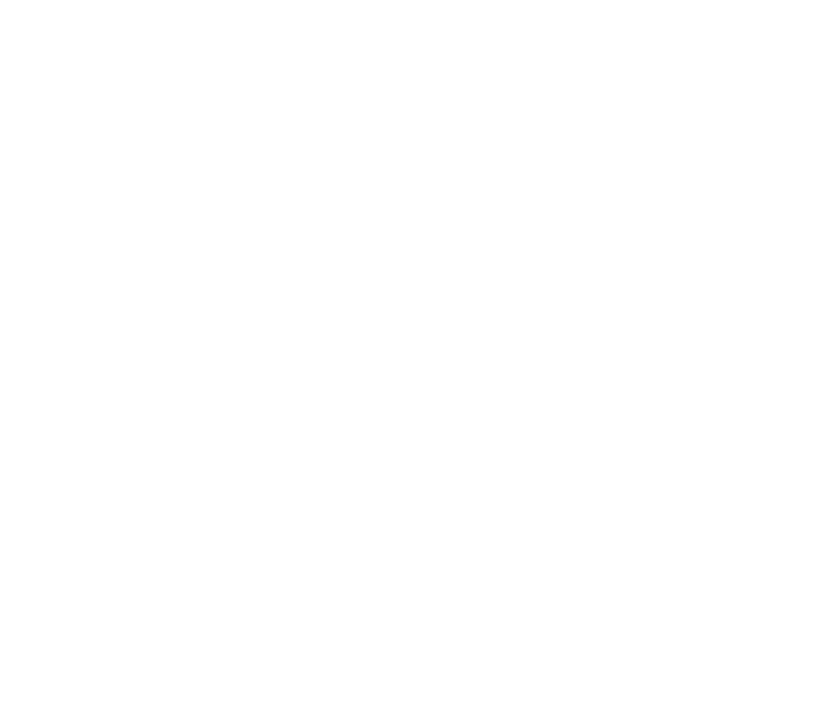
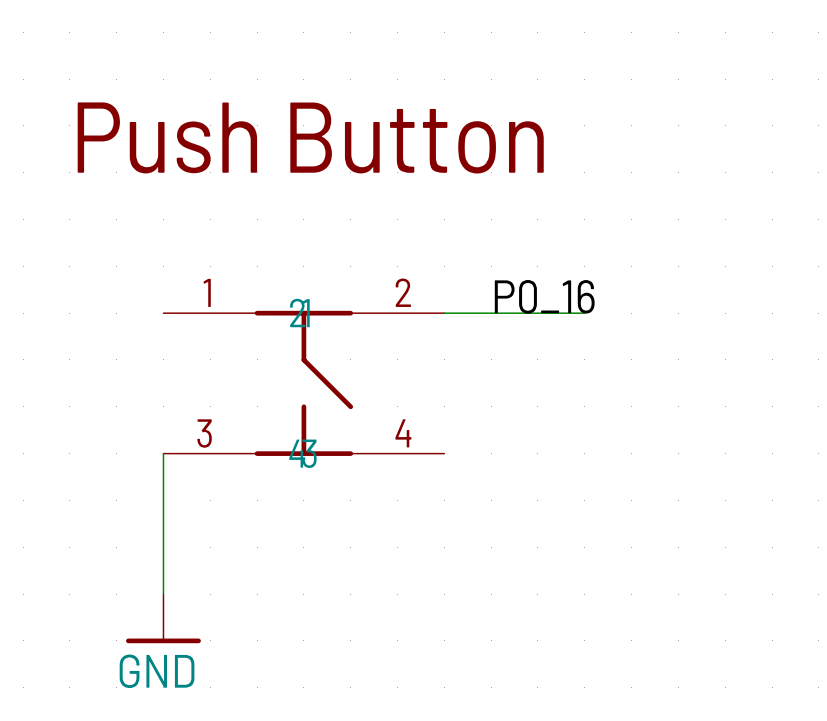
text: none -> Push Button (310, 137)
label: none -> P0_16 (544, 296)
wire: none -> (444, 313) (584, 313)
part: none -> (303, 383)
wire: none -> (163, 453) (163, 594)
power symbol: none -> GND (163, 618)

